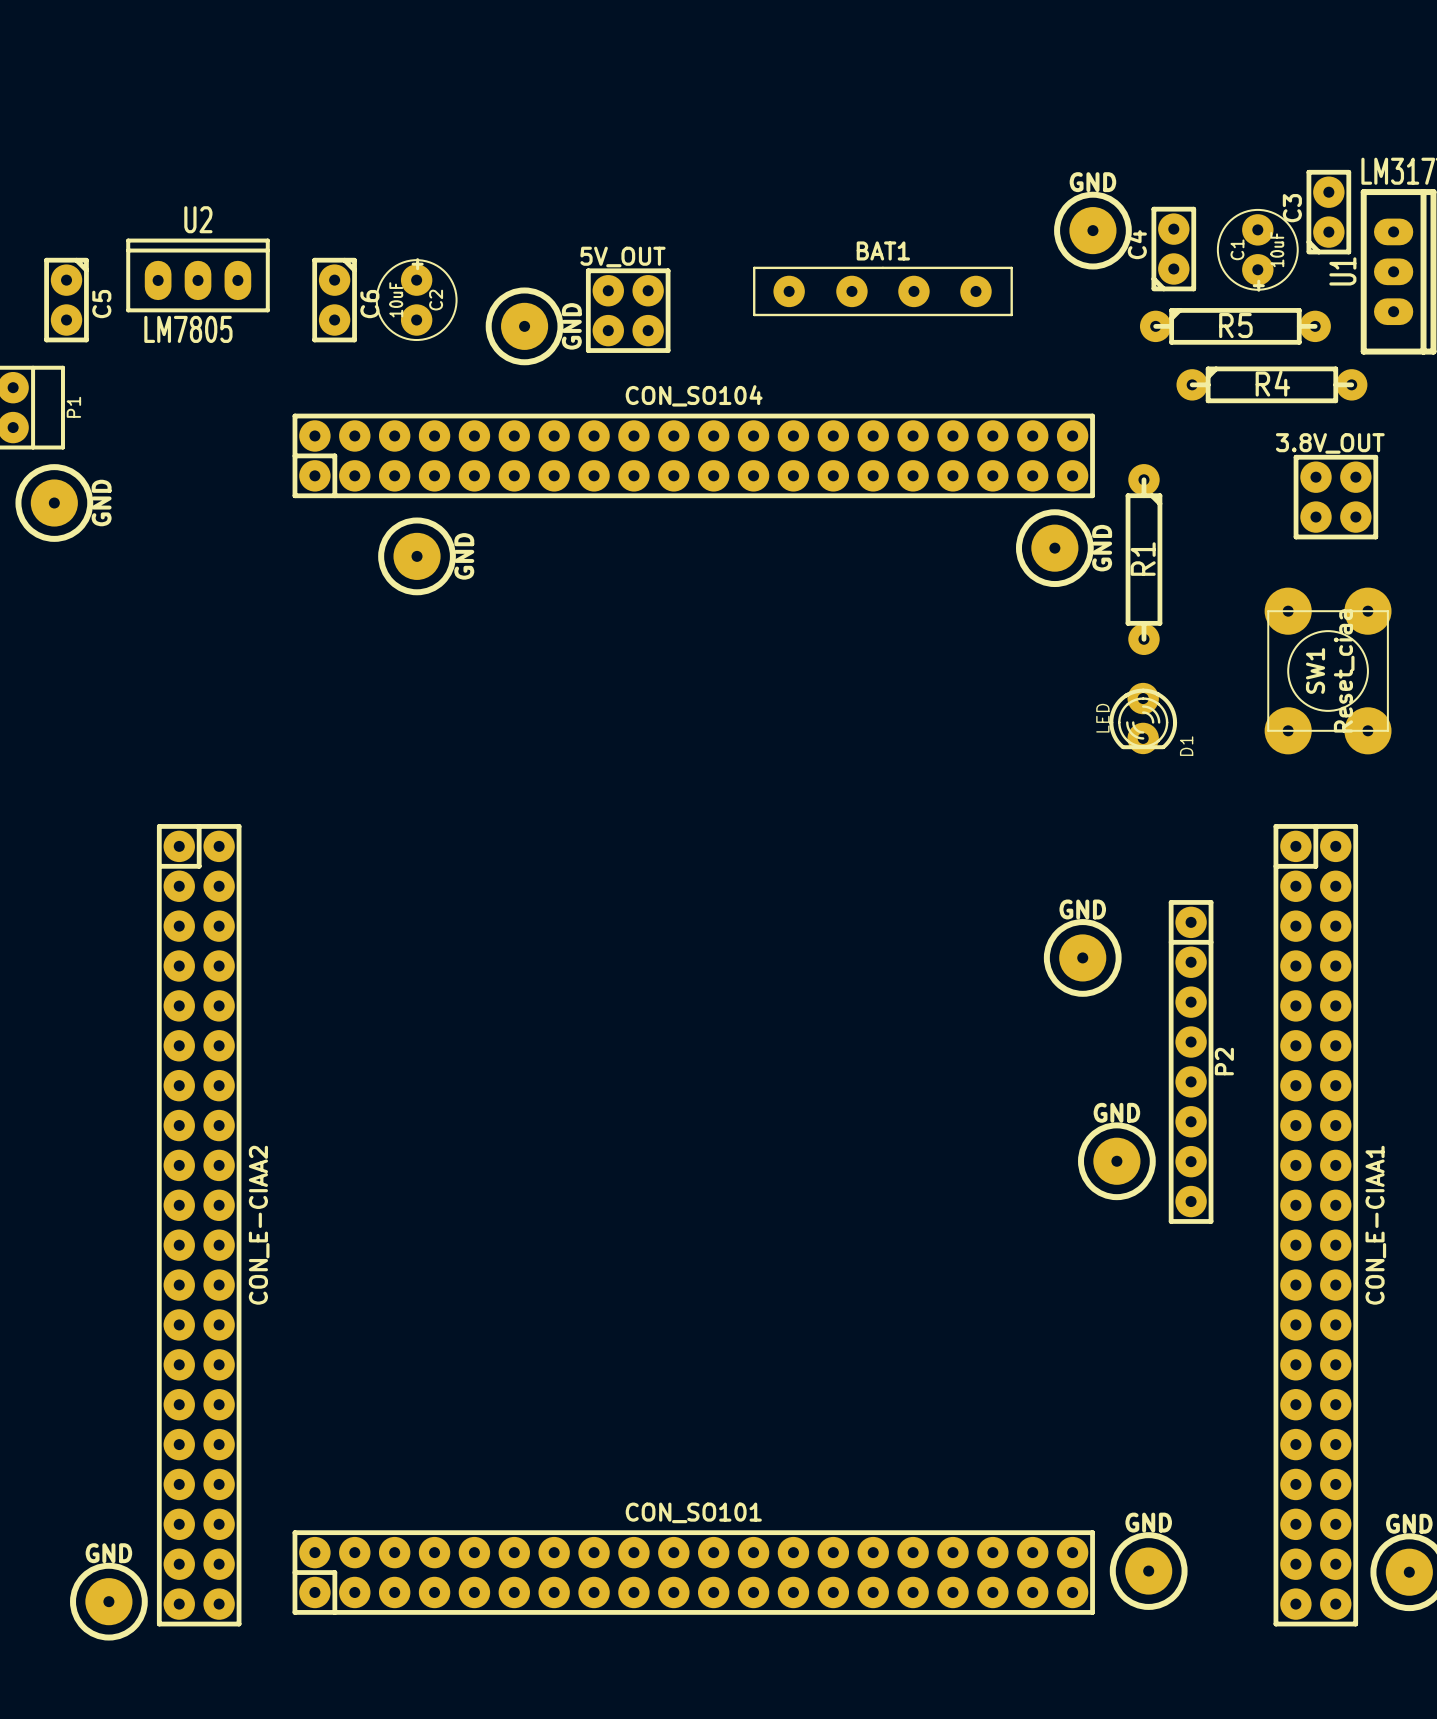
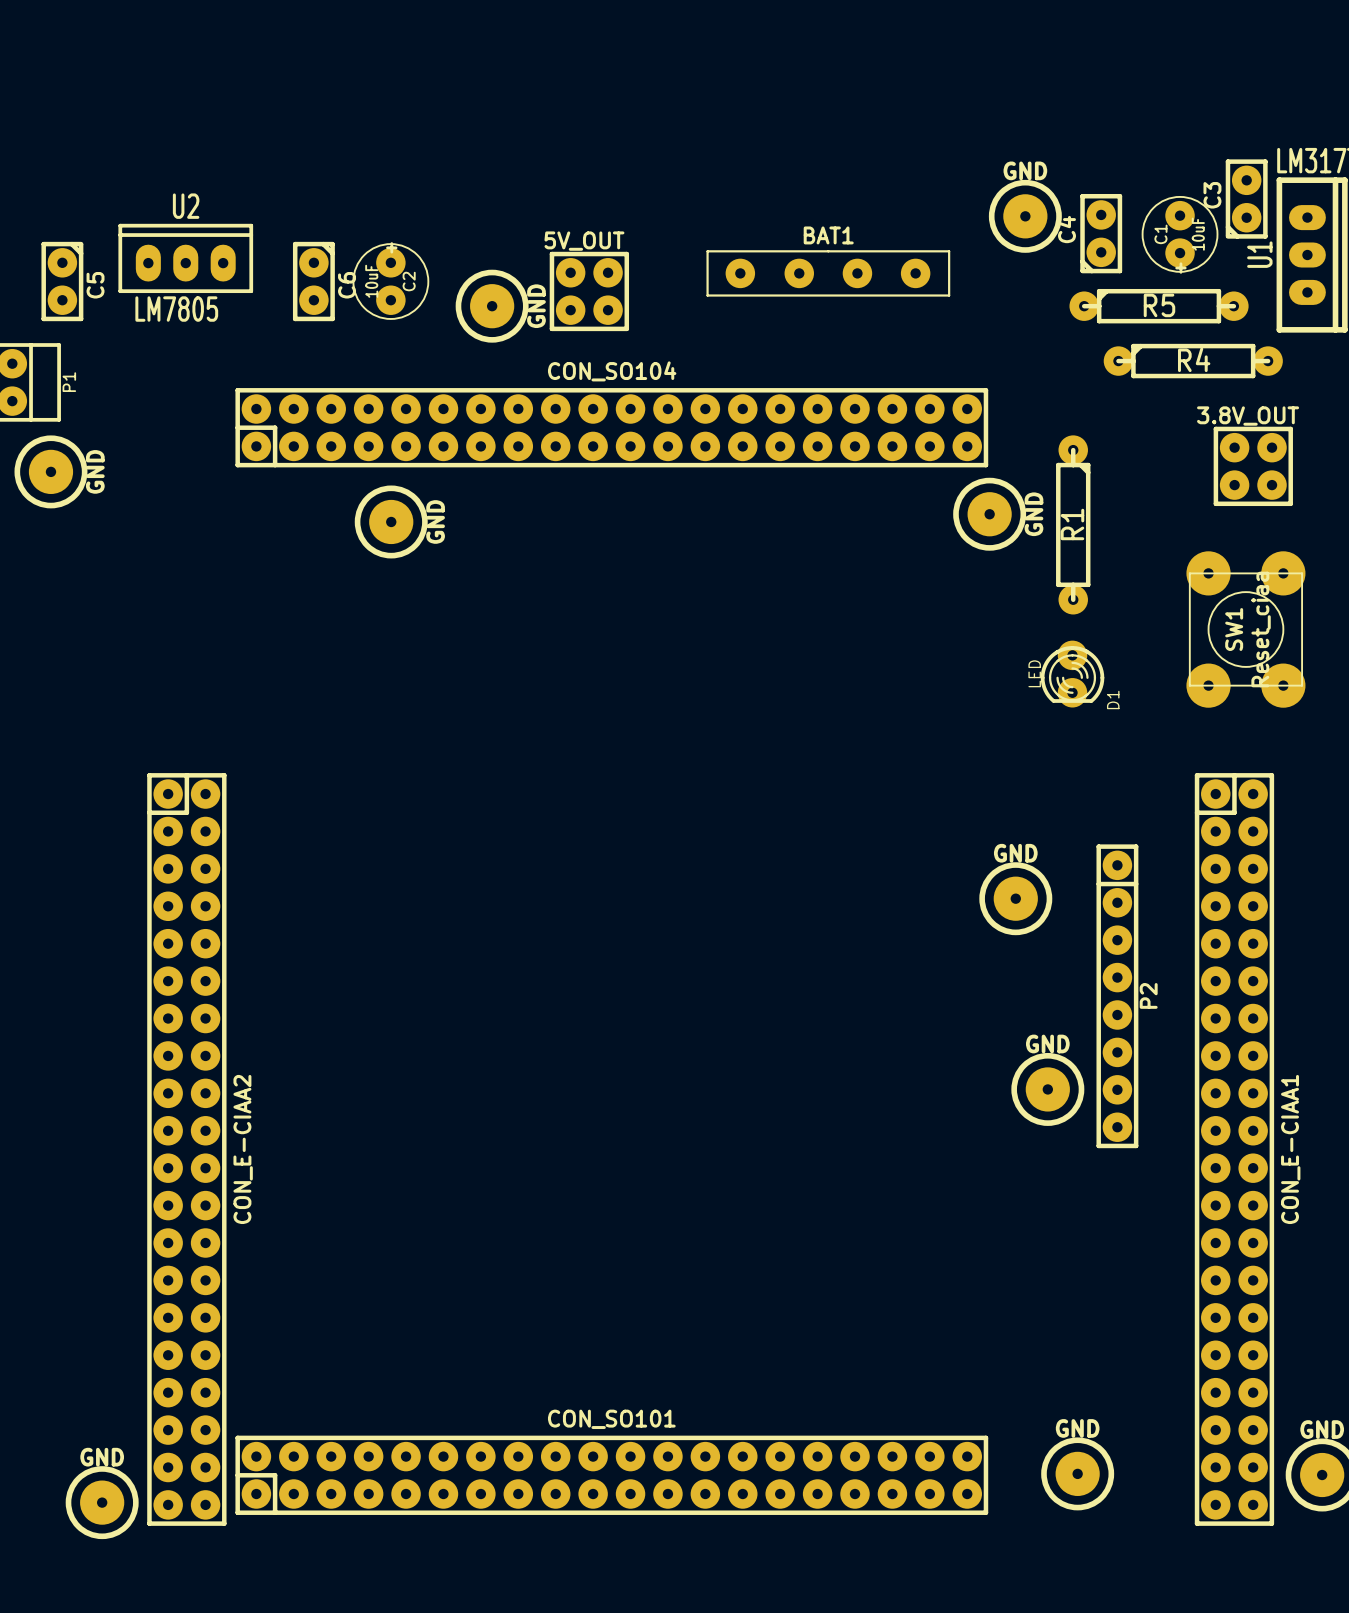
CON_SO104 position: (693, 455) -> (611, 427)
CON_SO101 position: (693, 1572) -> (611, 1475)

